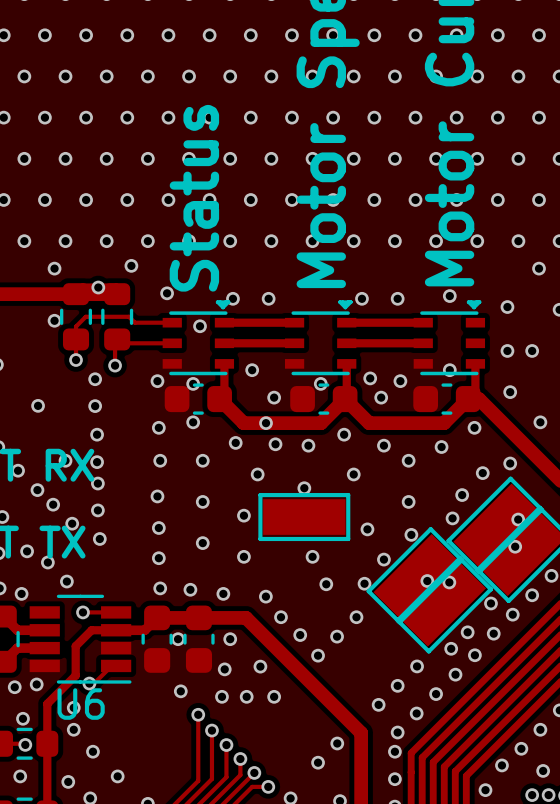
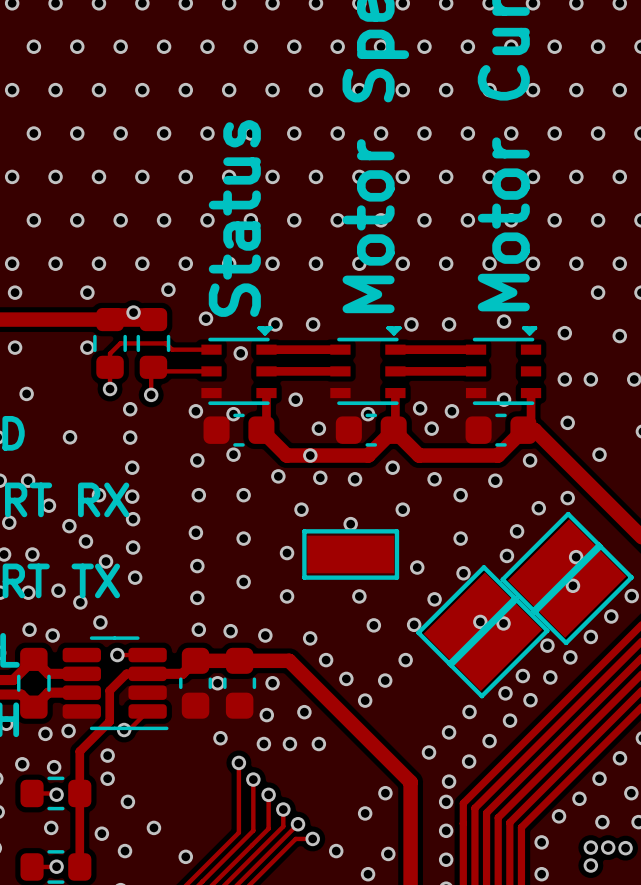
U6: (80, 639) -> none
part: none -> (115, 683)

